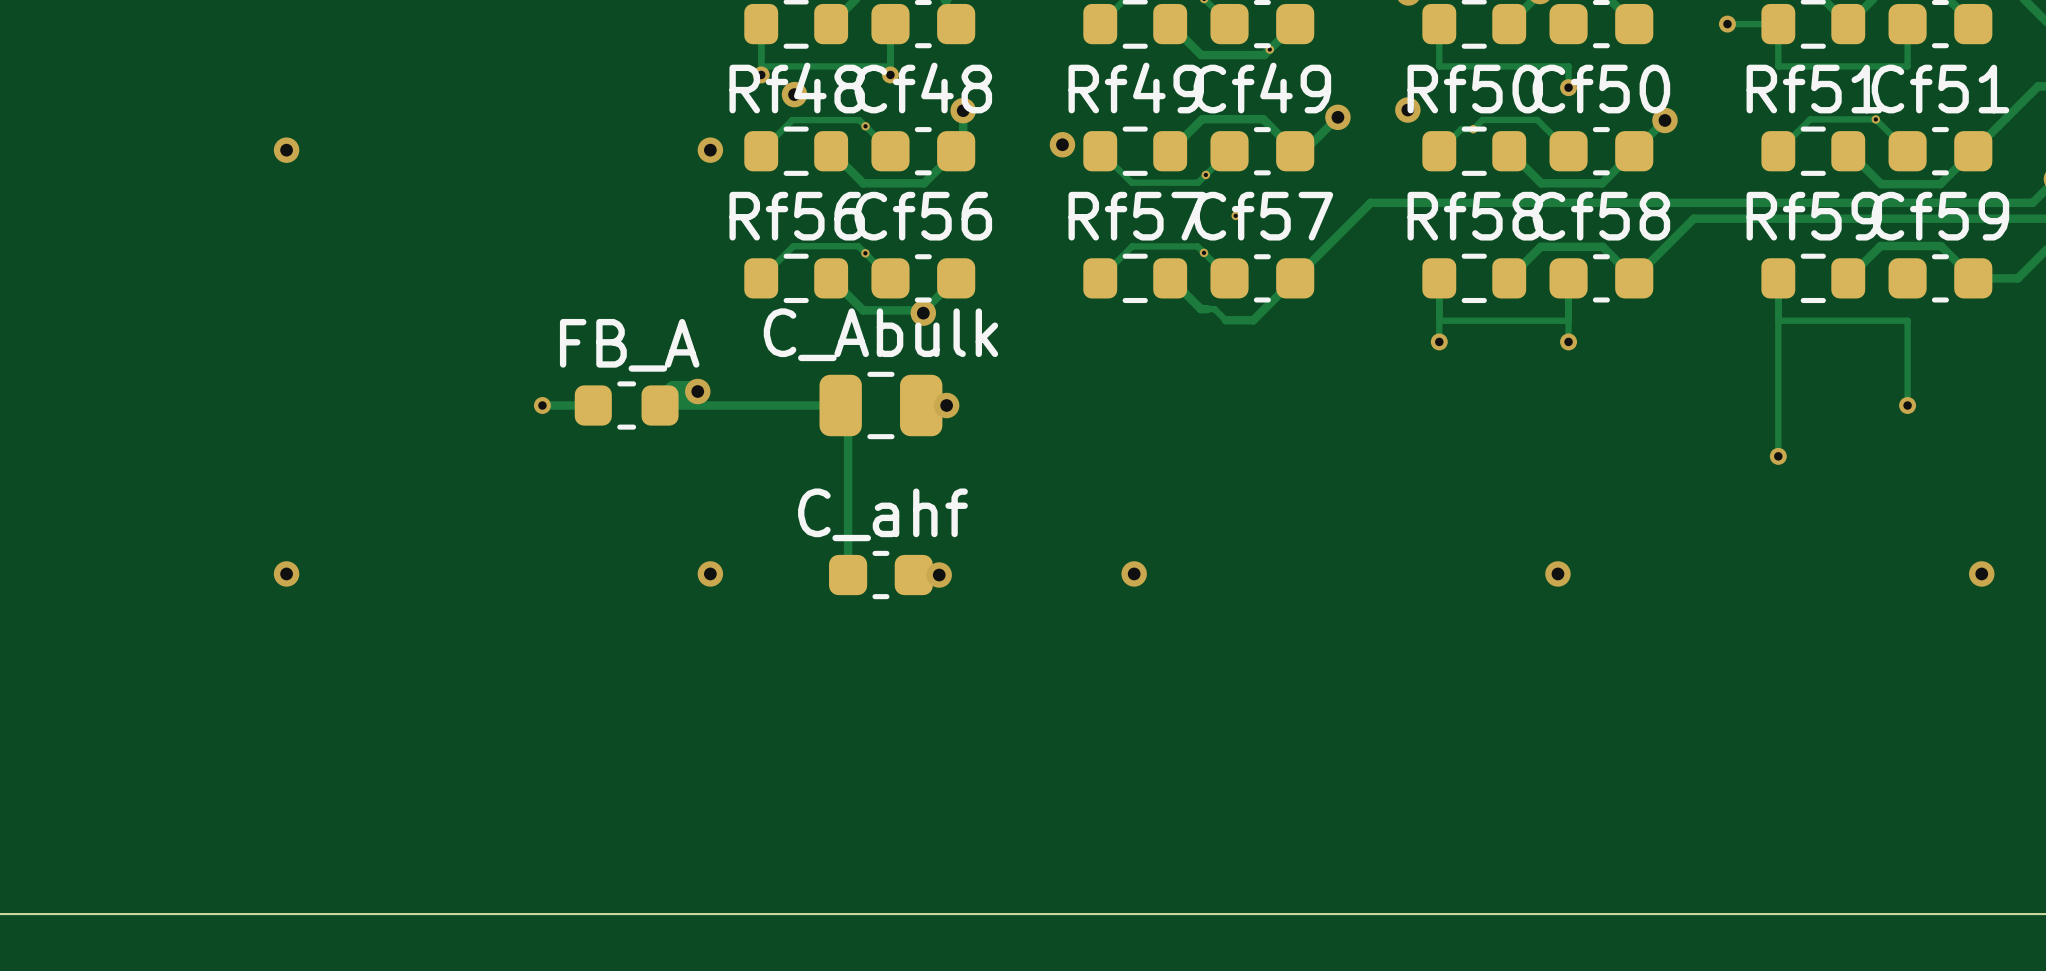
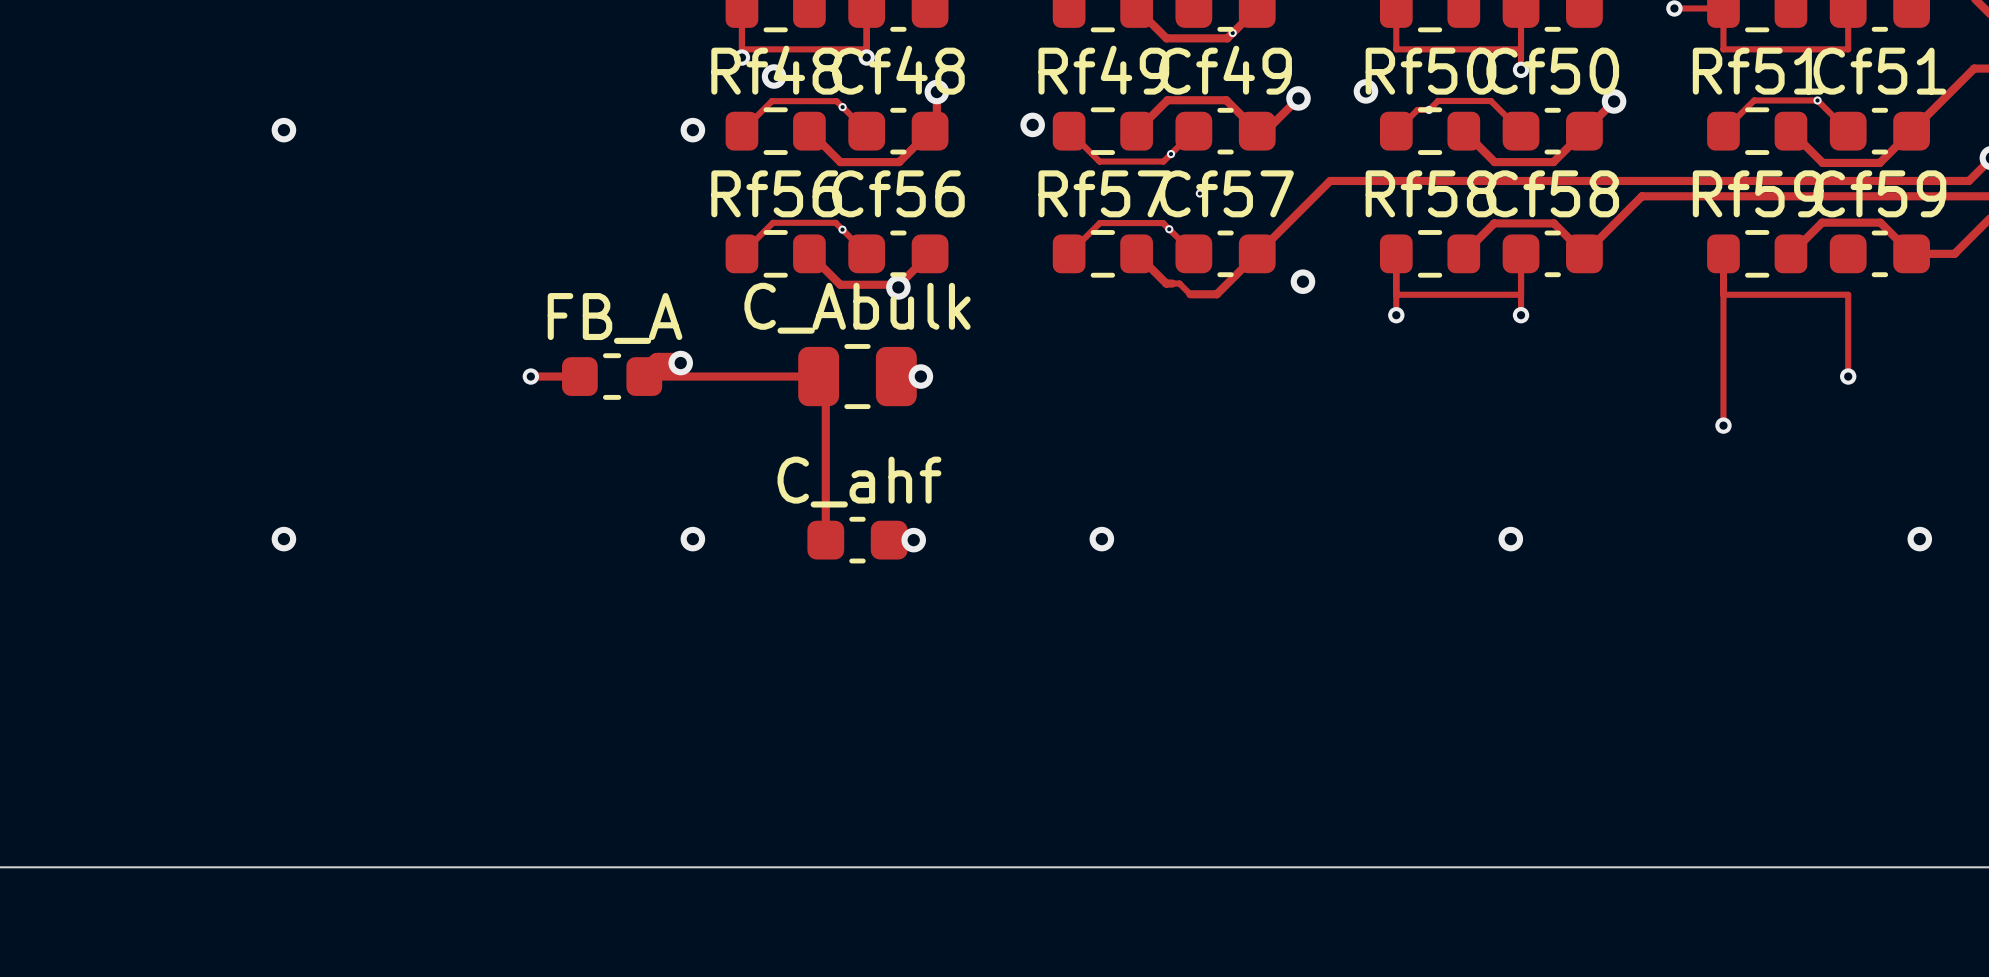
track: none -> (1521, 8) (1521, 49)
via: none -> (1302, 281)

